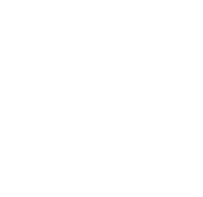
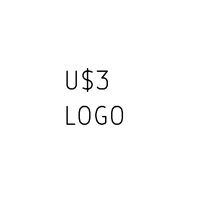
U$3: none -> (87, 80)
part: none -> (94, 115)

